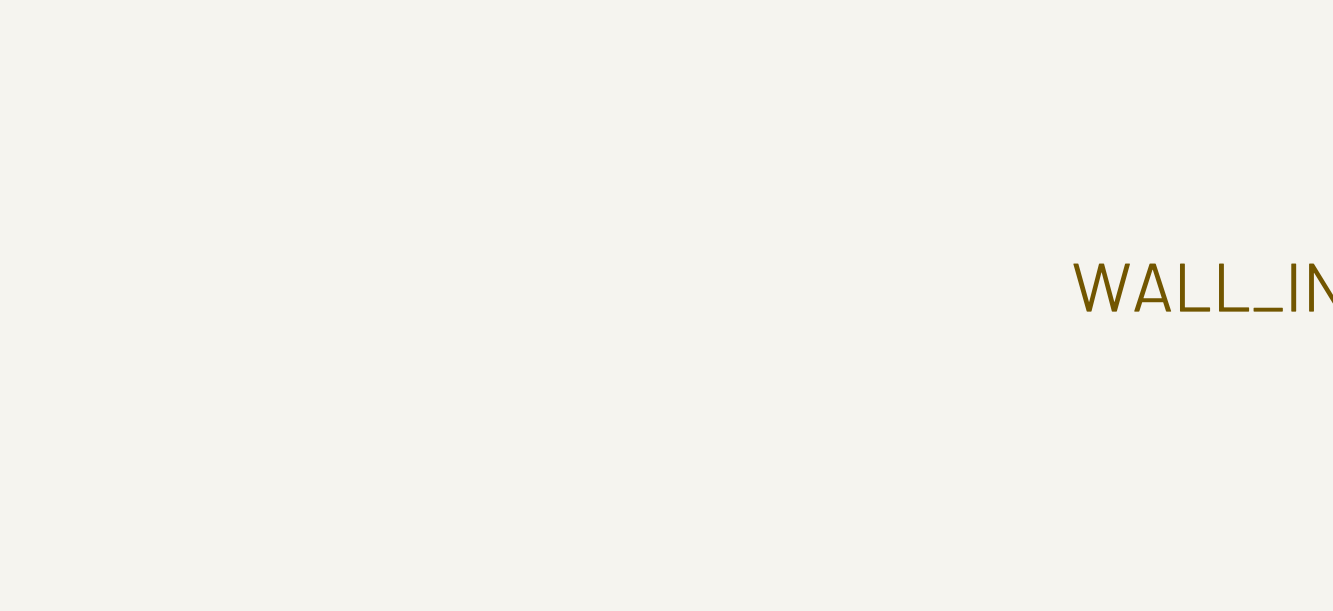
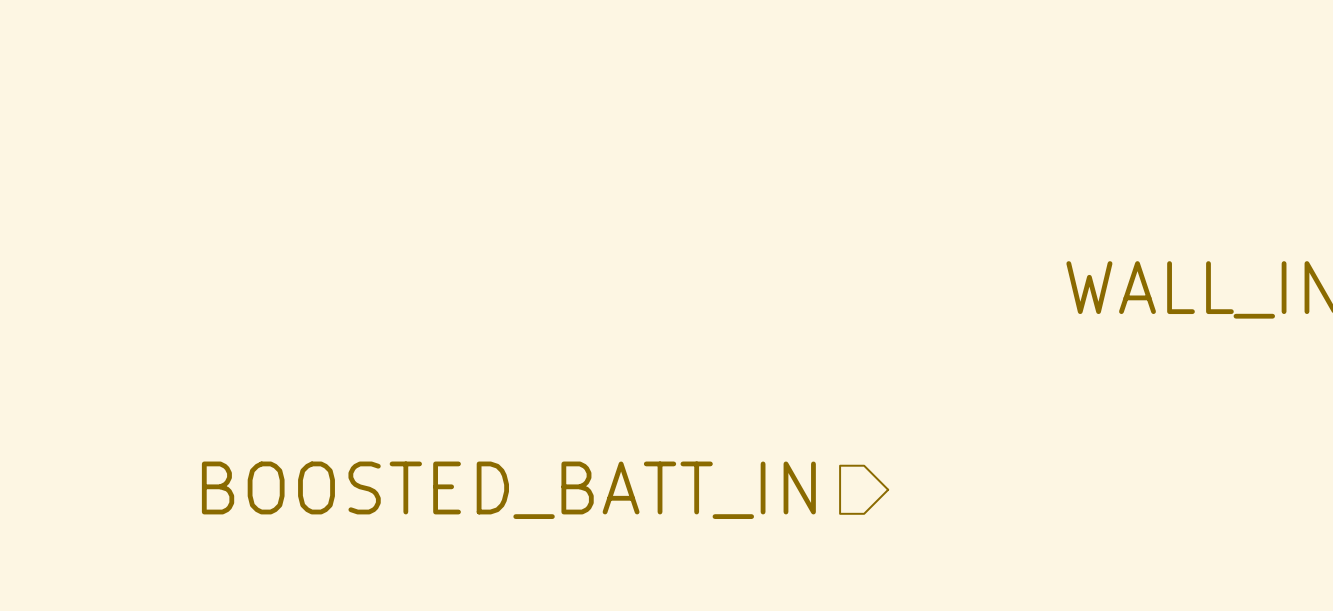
hierarchical label: none -> BOOSTED_BATT_IN (508, 490)

